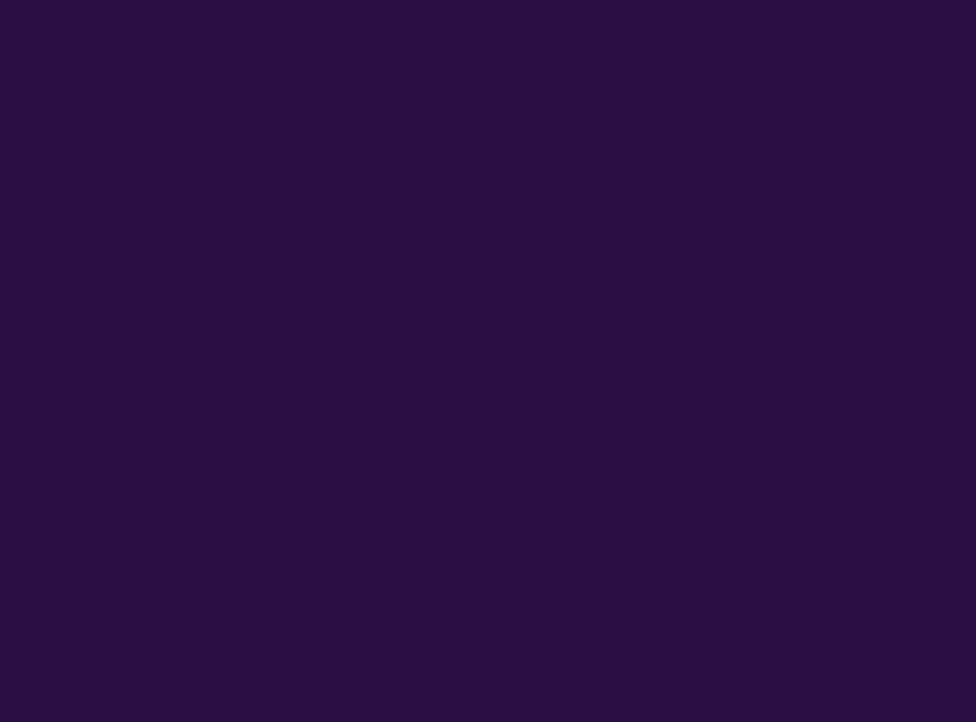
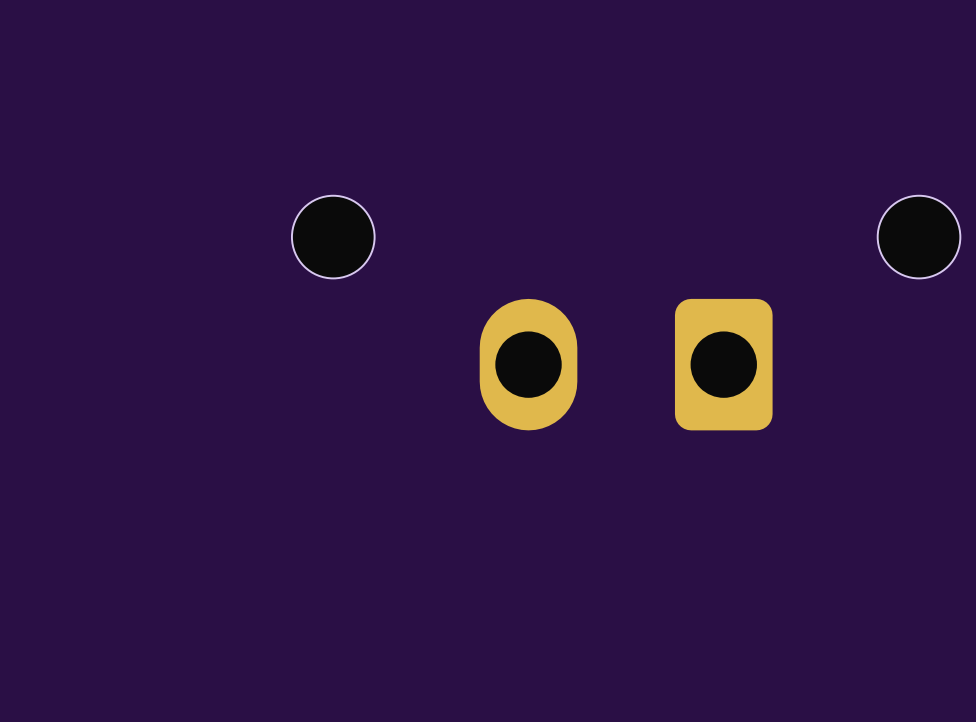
part: none -> (626, 313)

